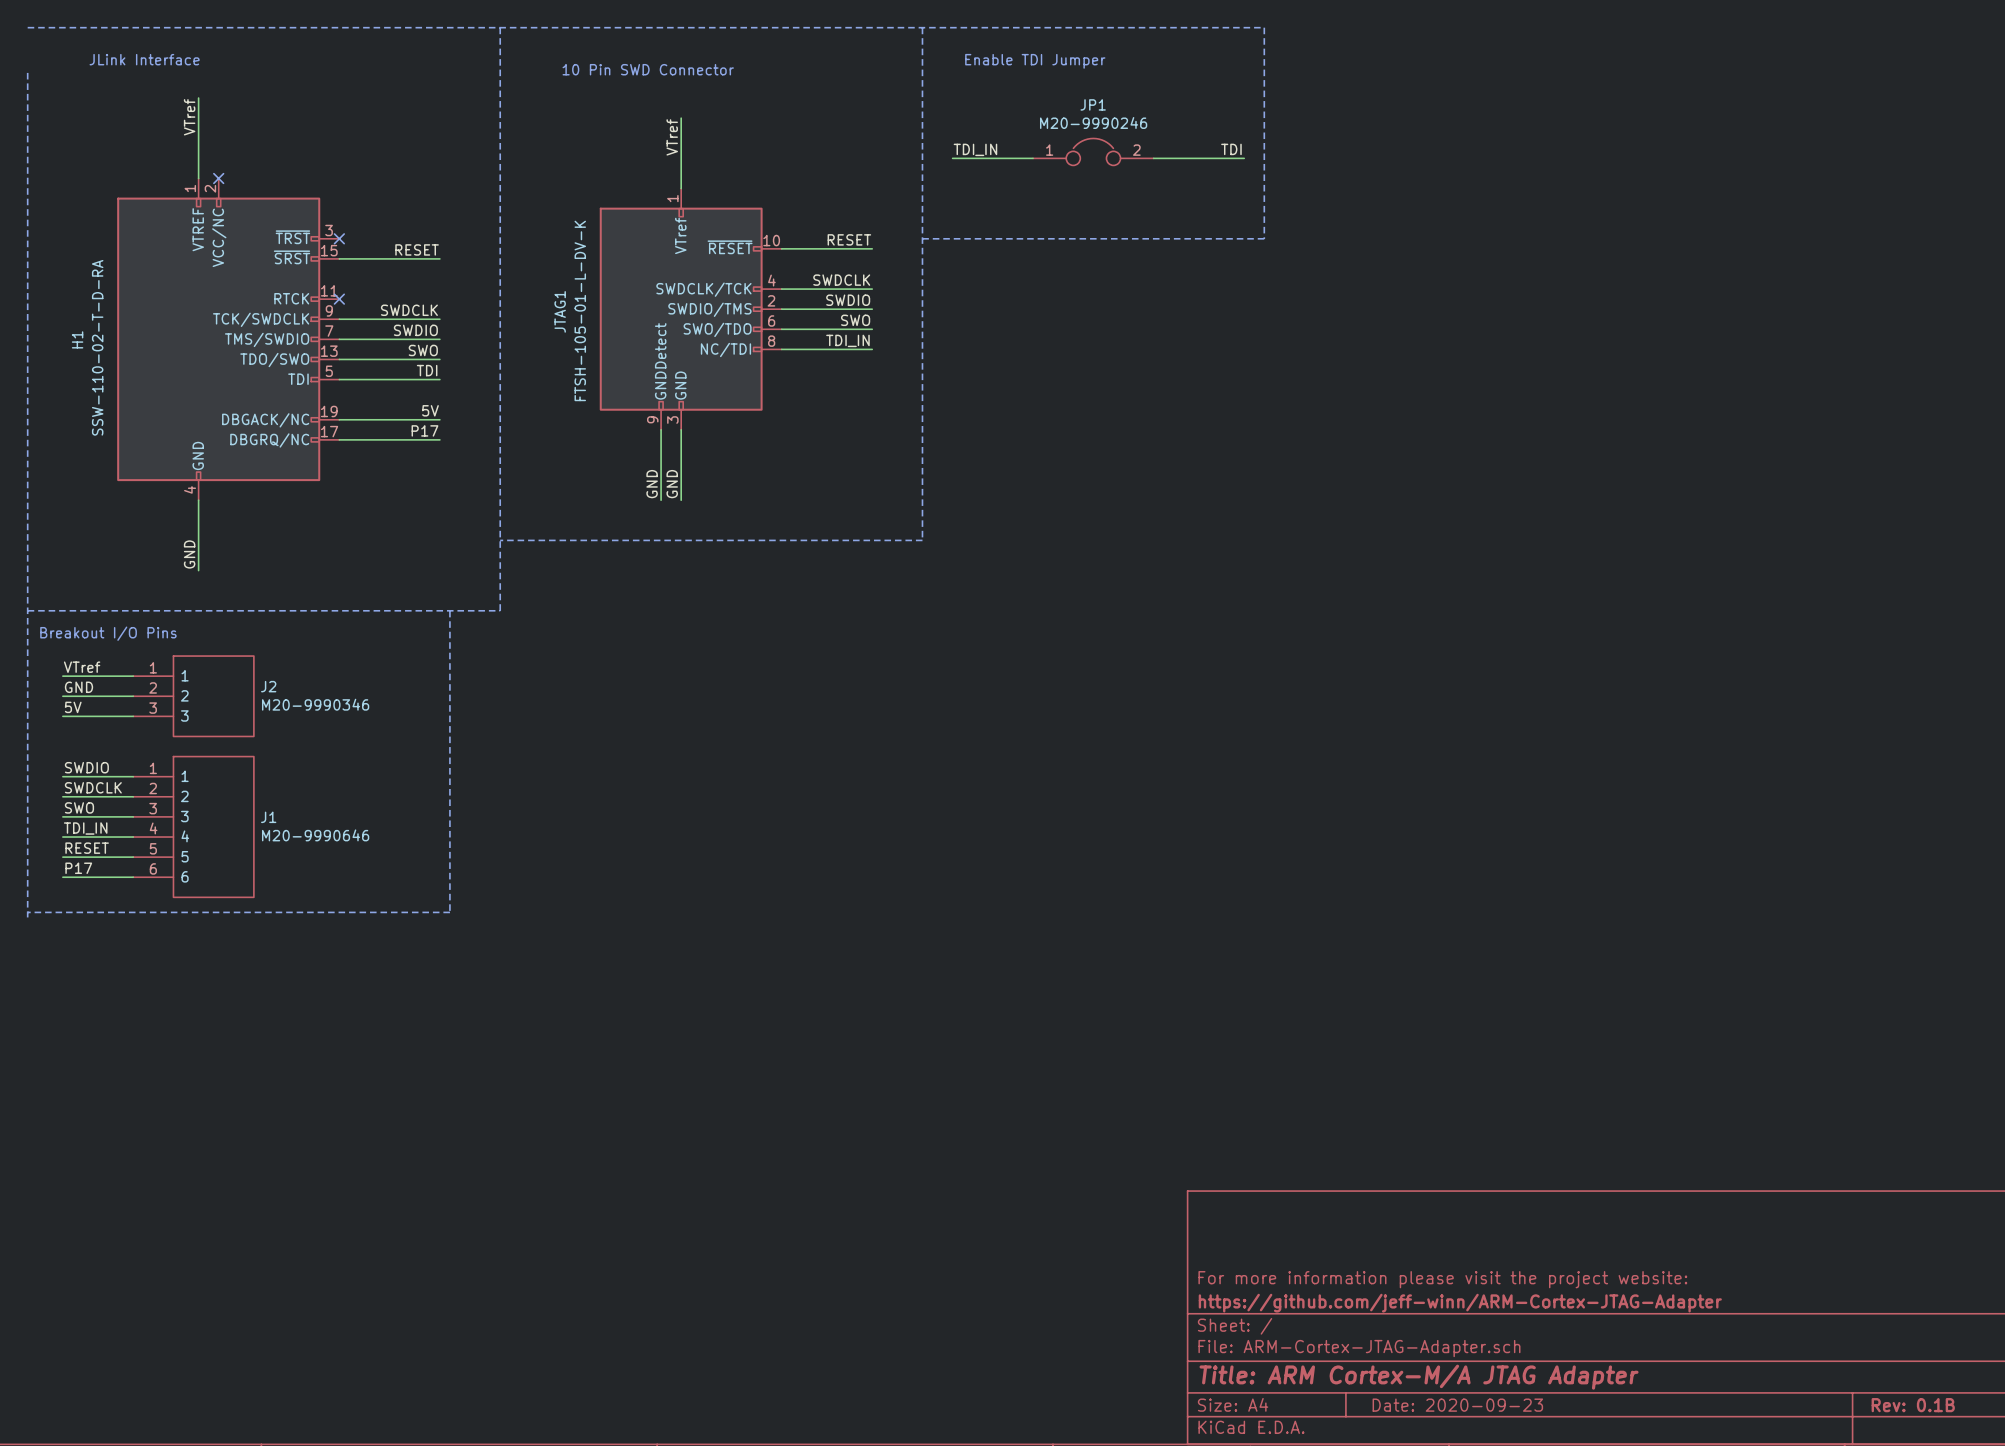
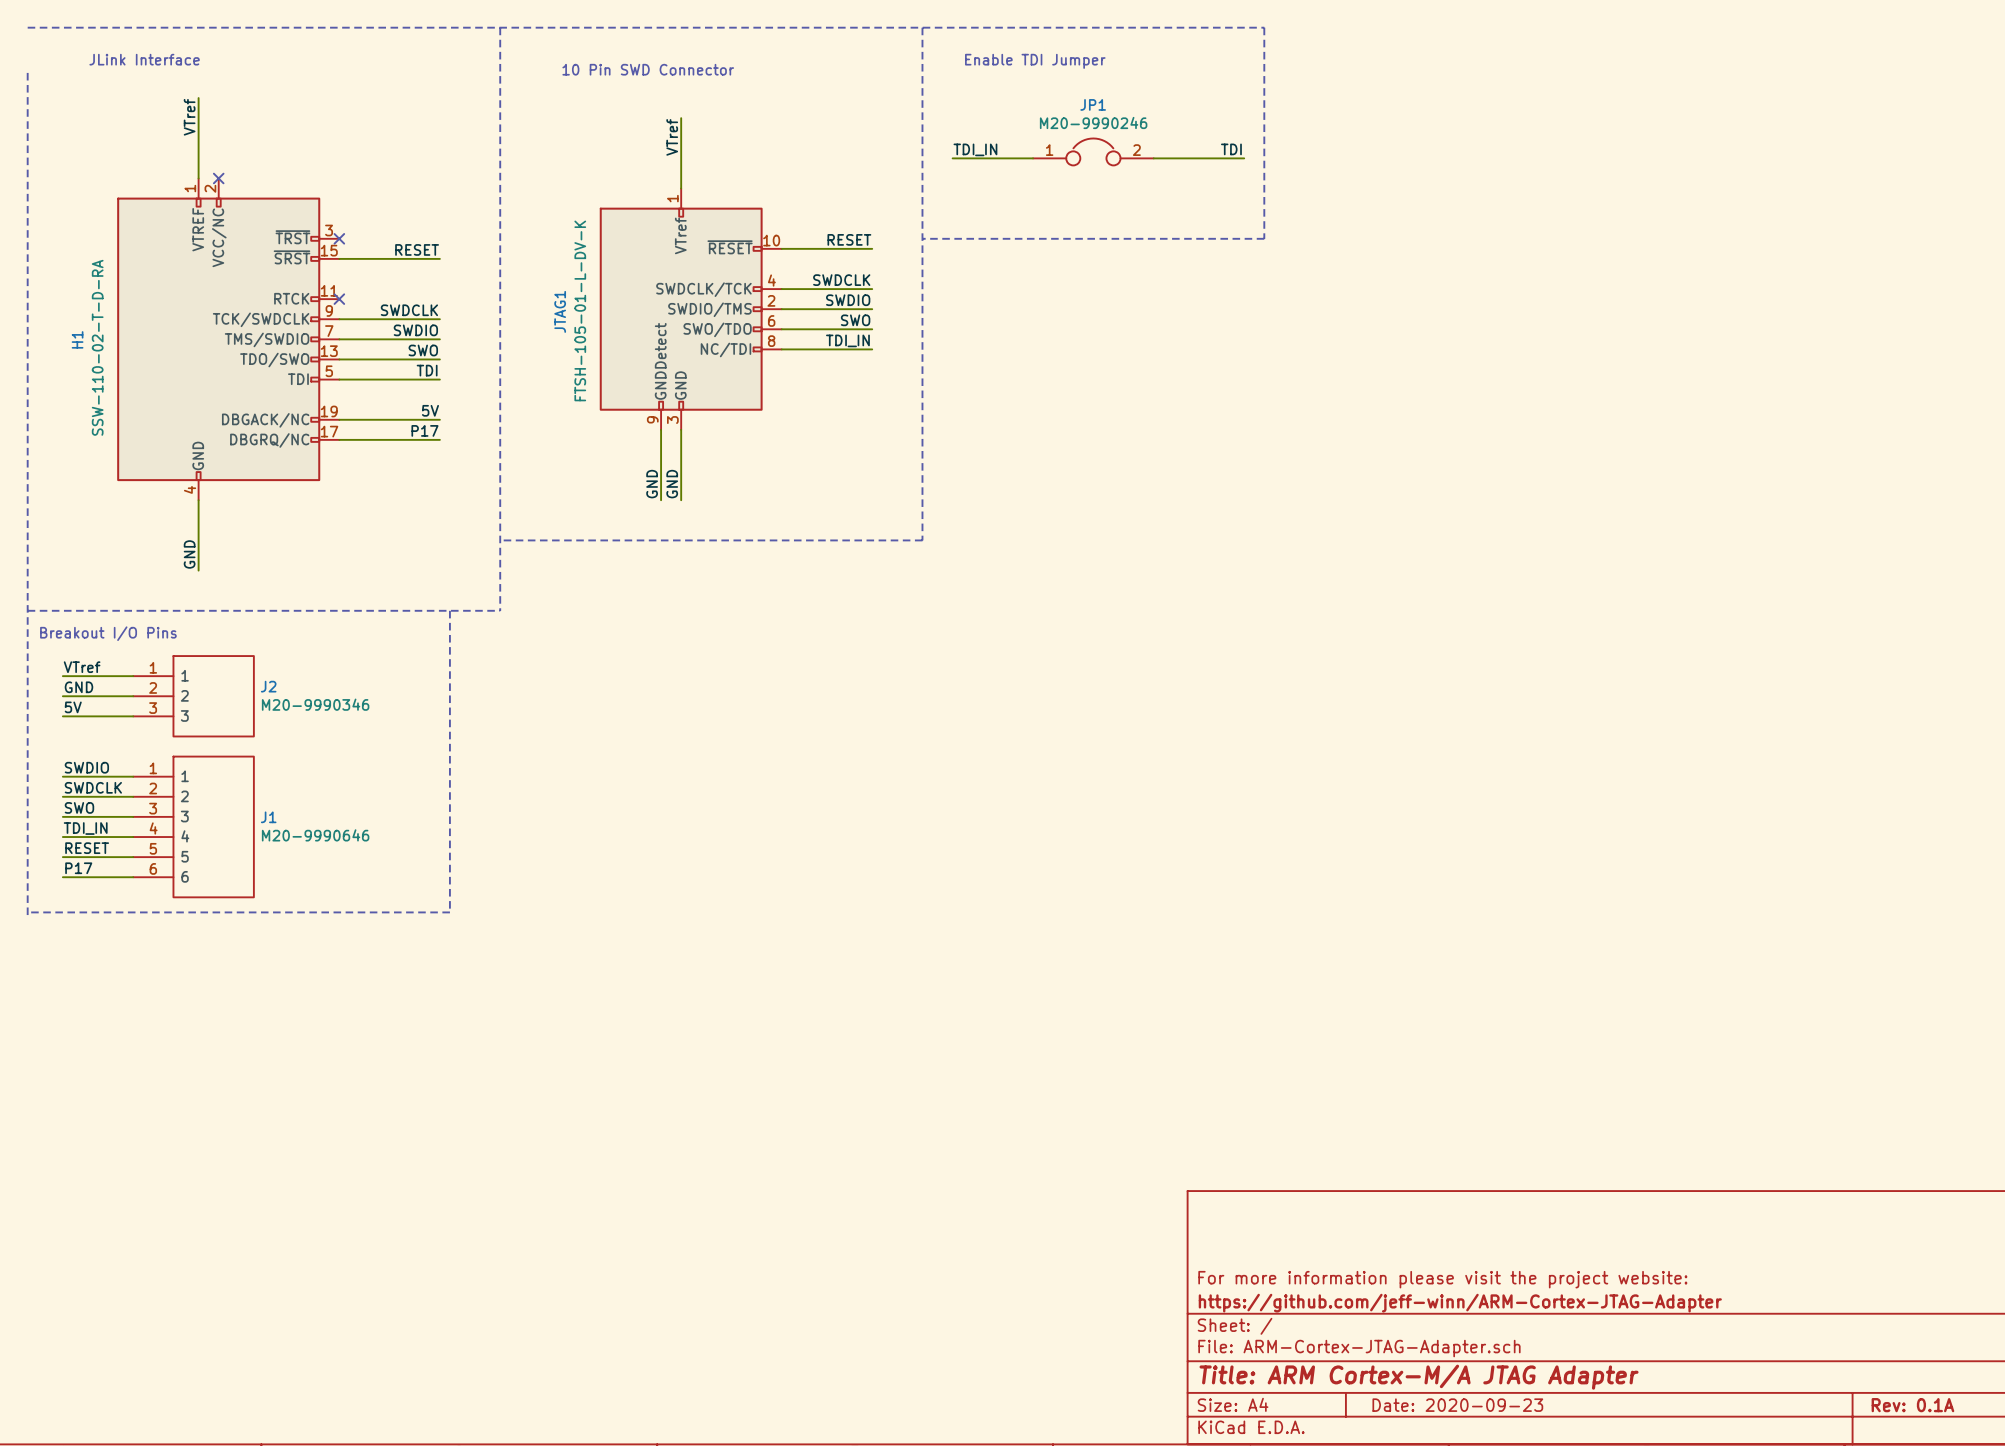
title block: Rev: 0.1B (1913, 1405) -> Rev: 0.1A (1912, 1405)

